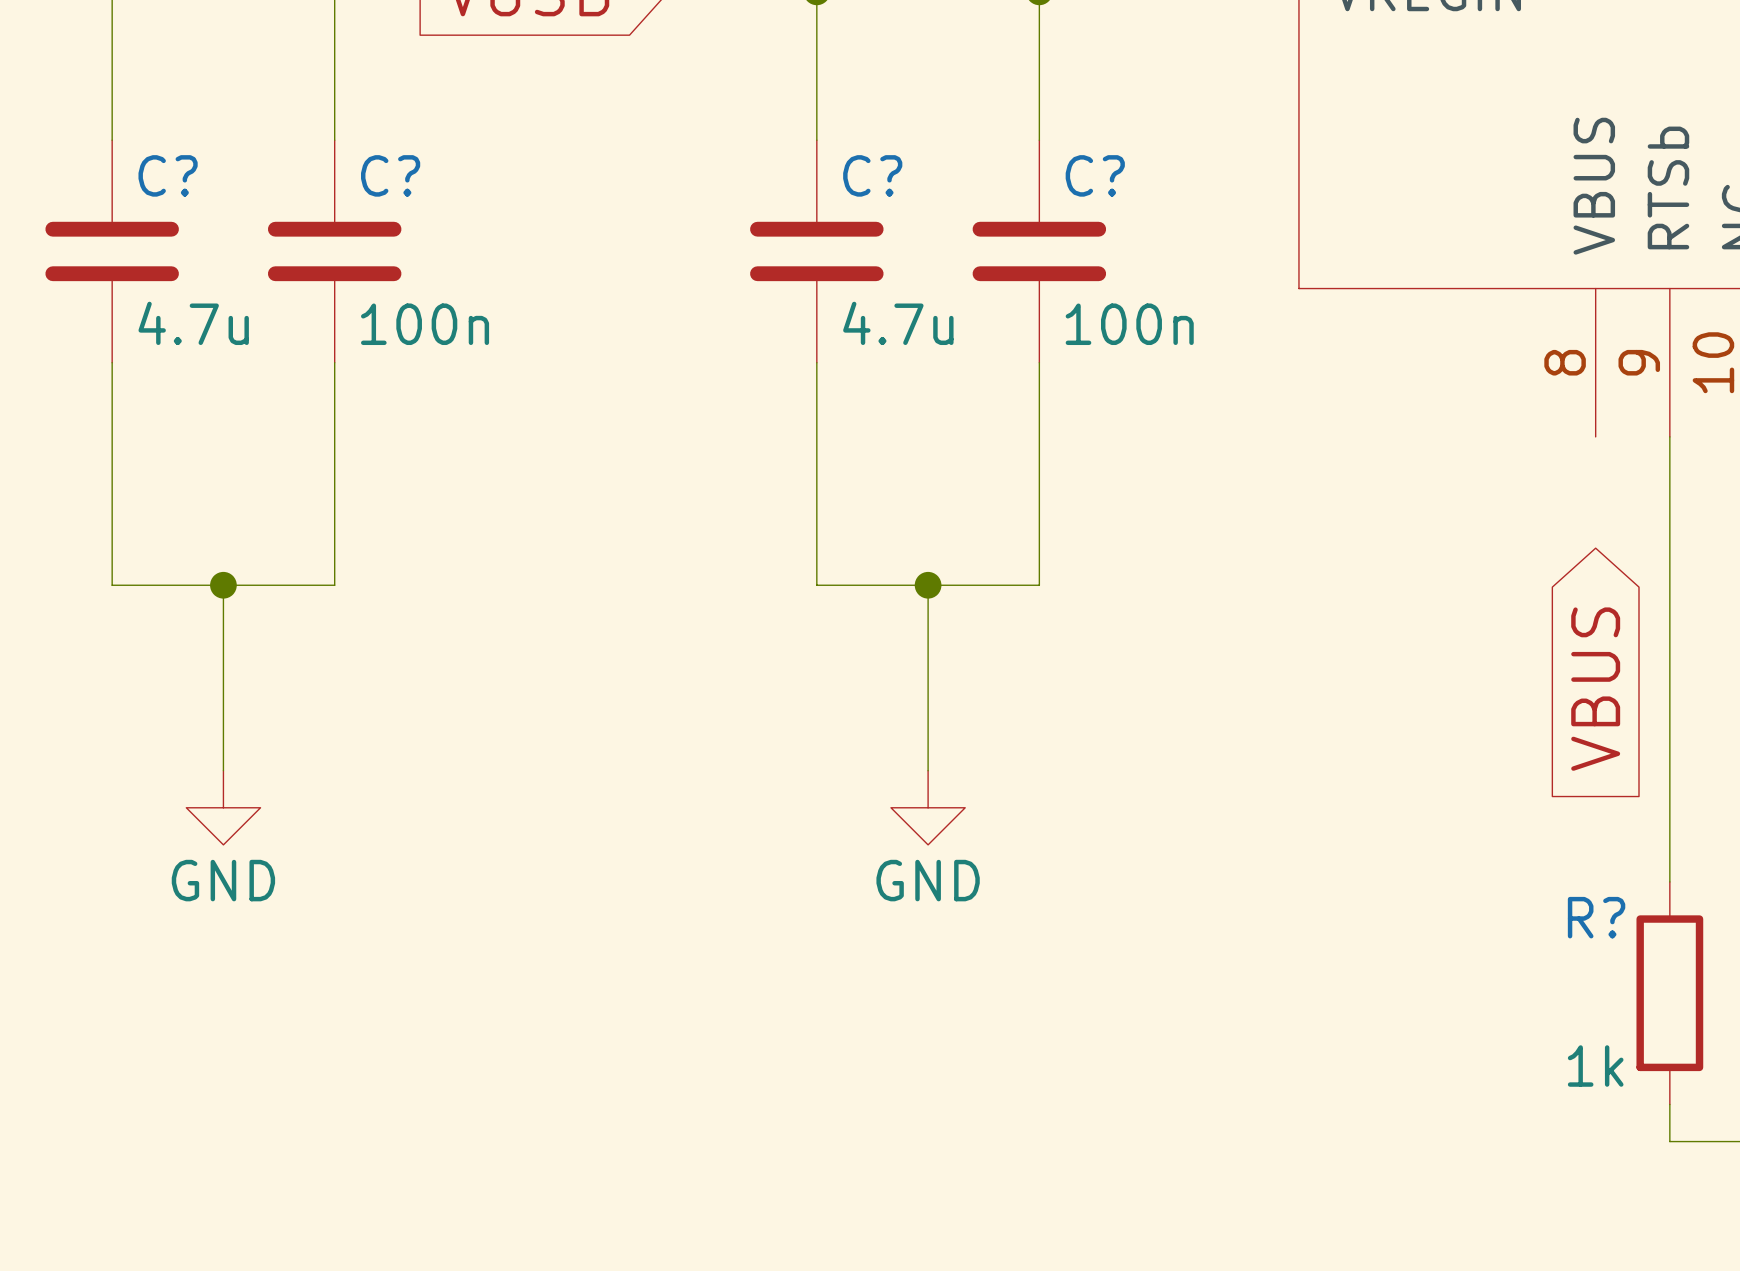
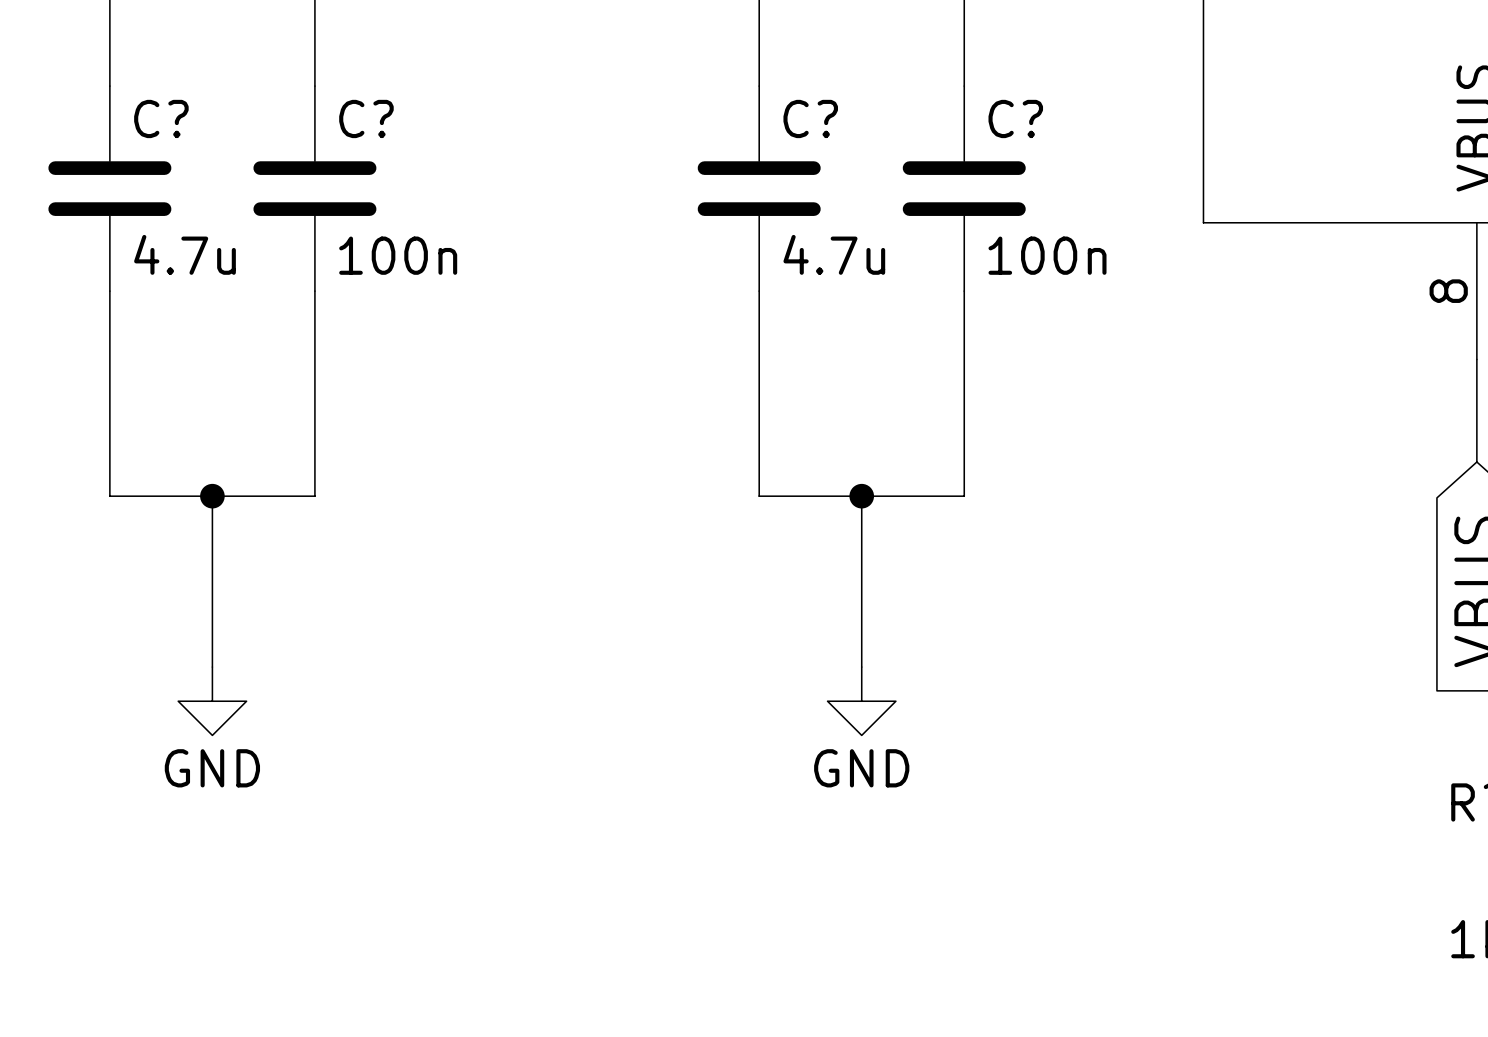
wire: none -> (1476, 359) (1476, 462)

